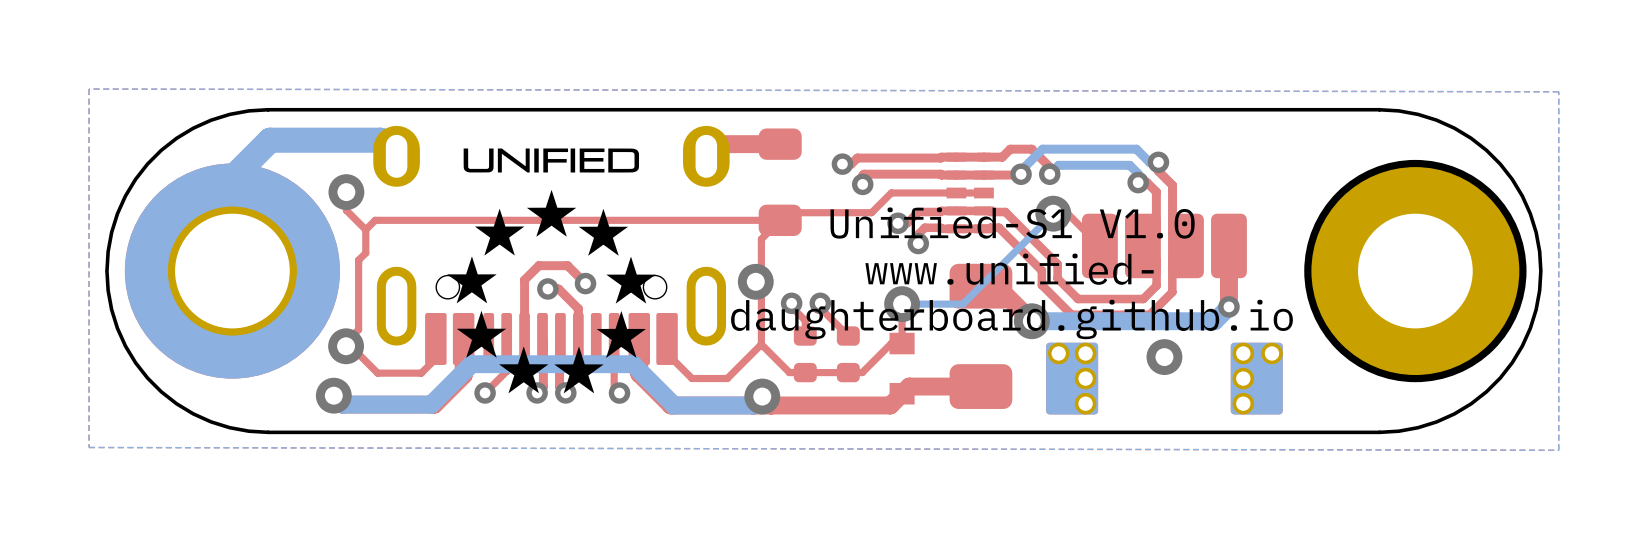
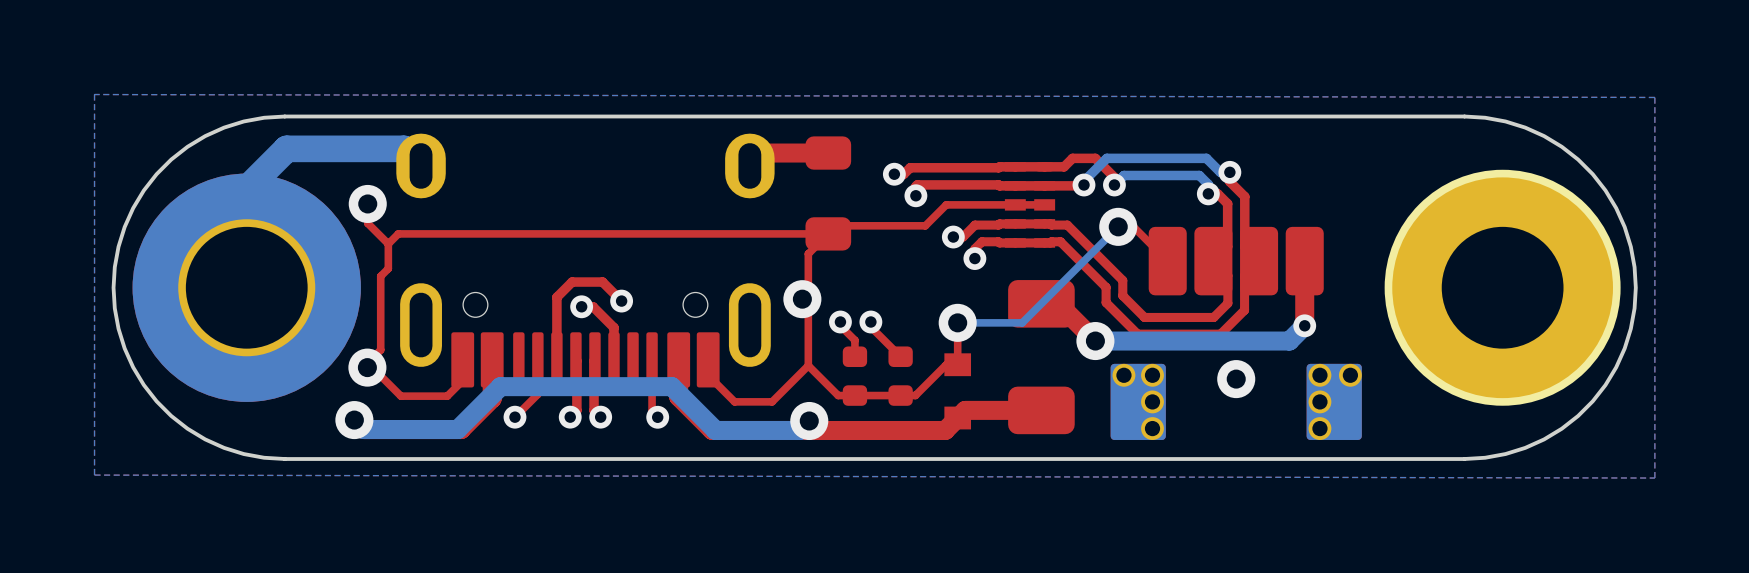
drawing: [447, 148, 656, 394] -> none
text: Unified-S1 V1.0 (1012, 223) -> none
text: www.unified- (1009, 269) -> none
text: daughterboard.github.io (1011, 319) -> none

